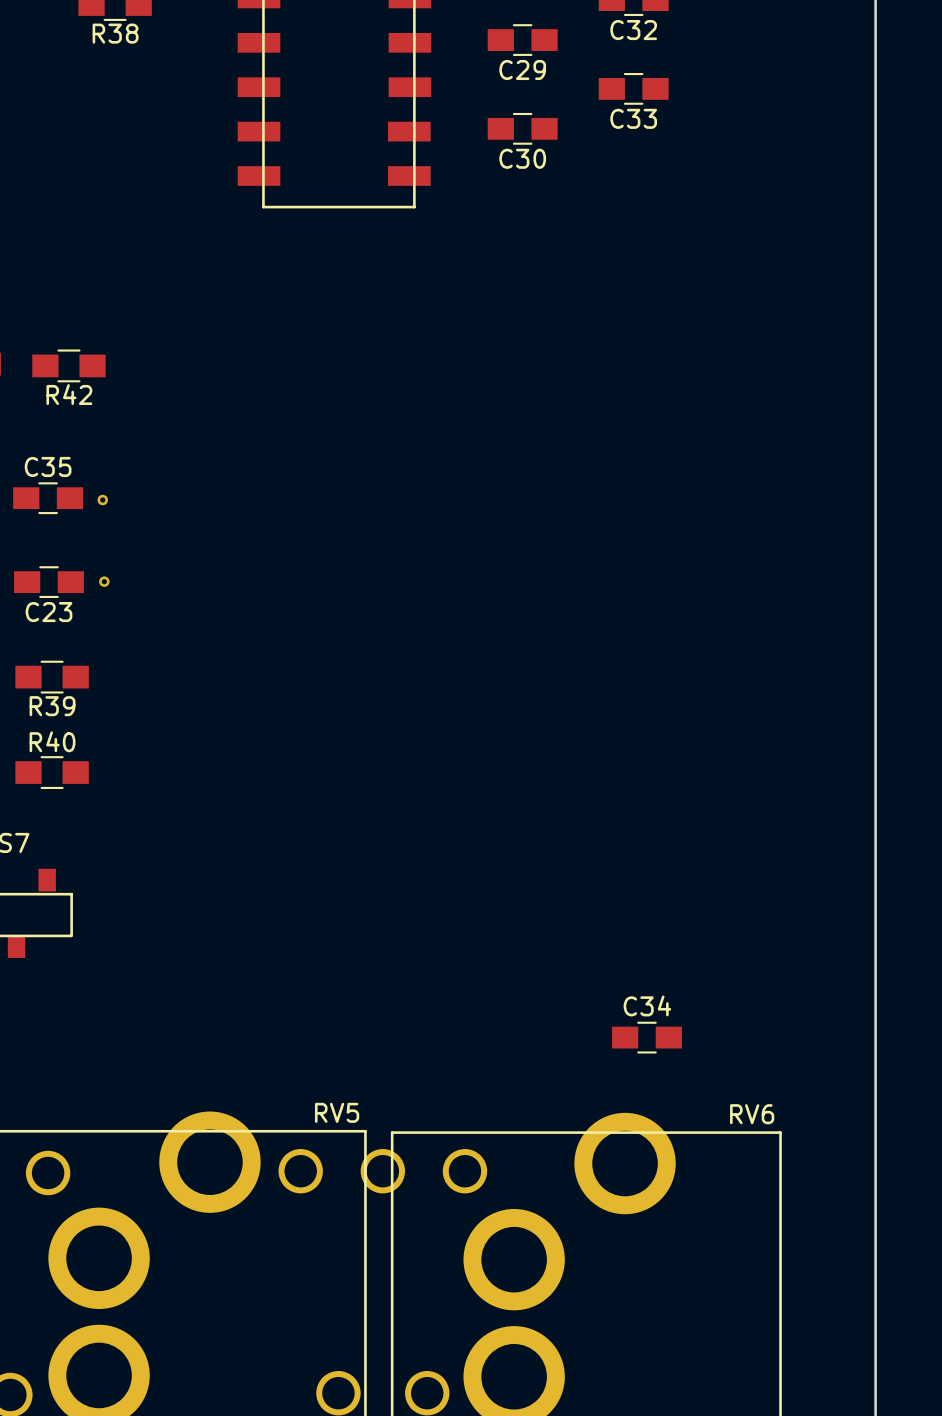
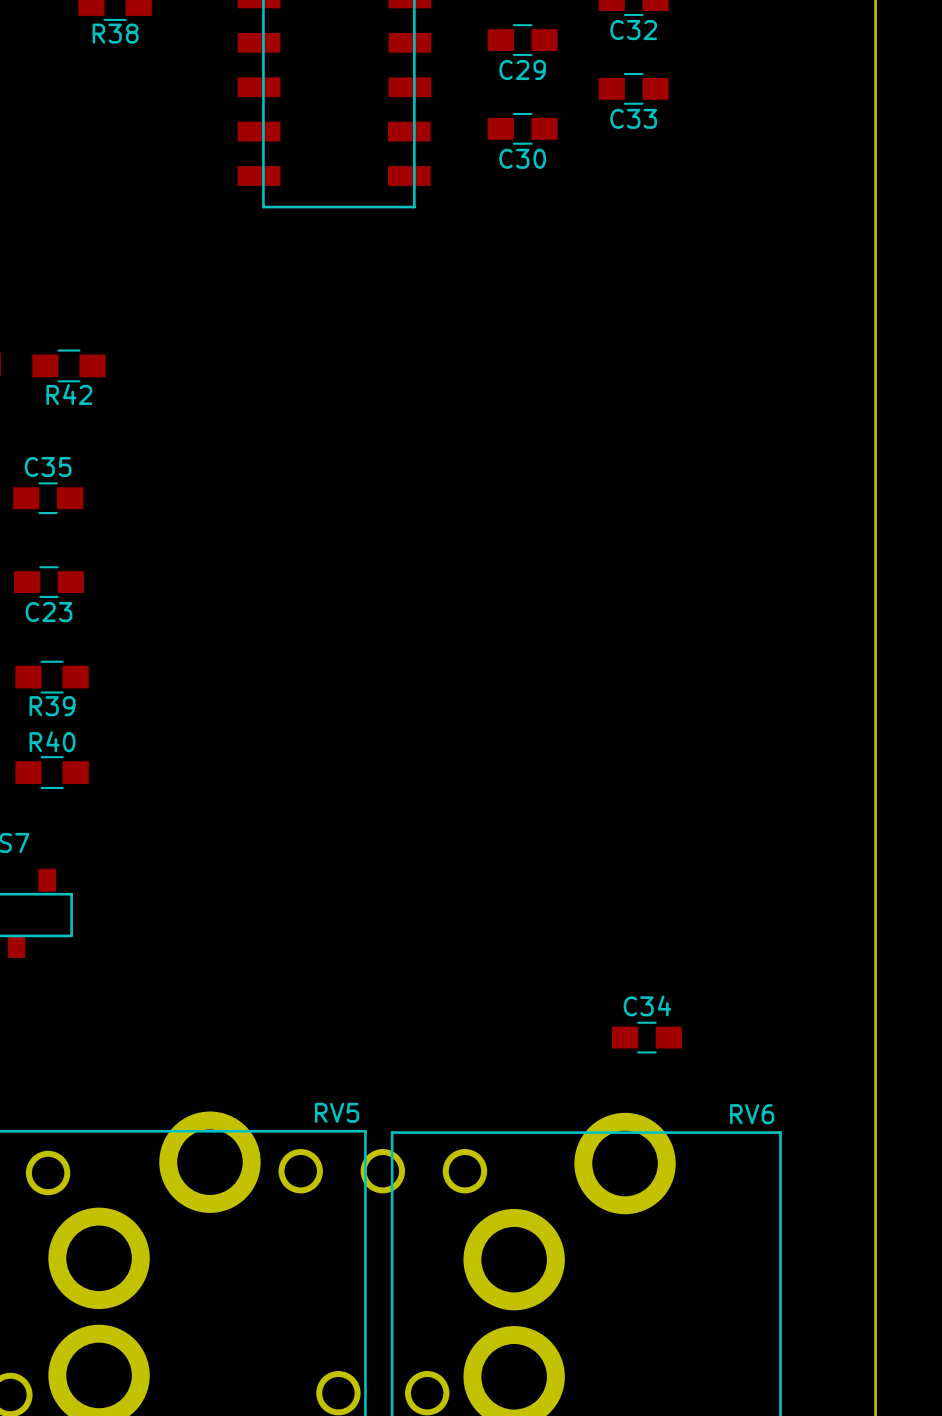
part: (102, 500) -> none
part: (104, 581) -> none

